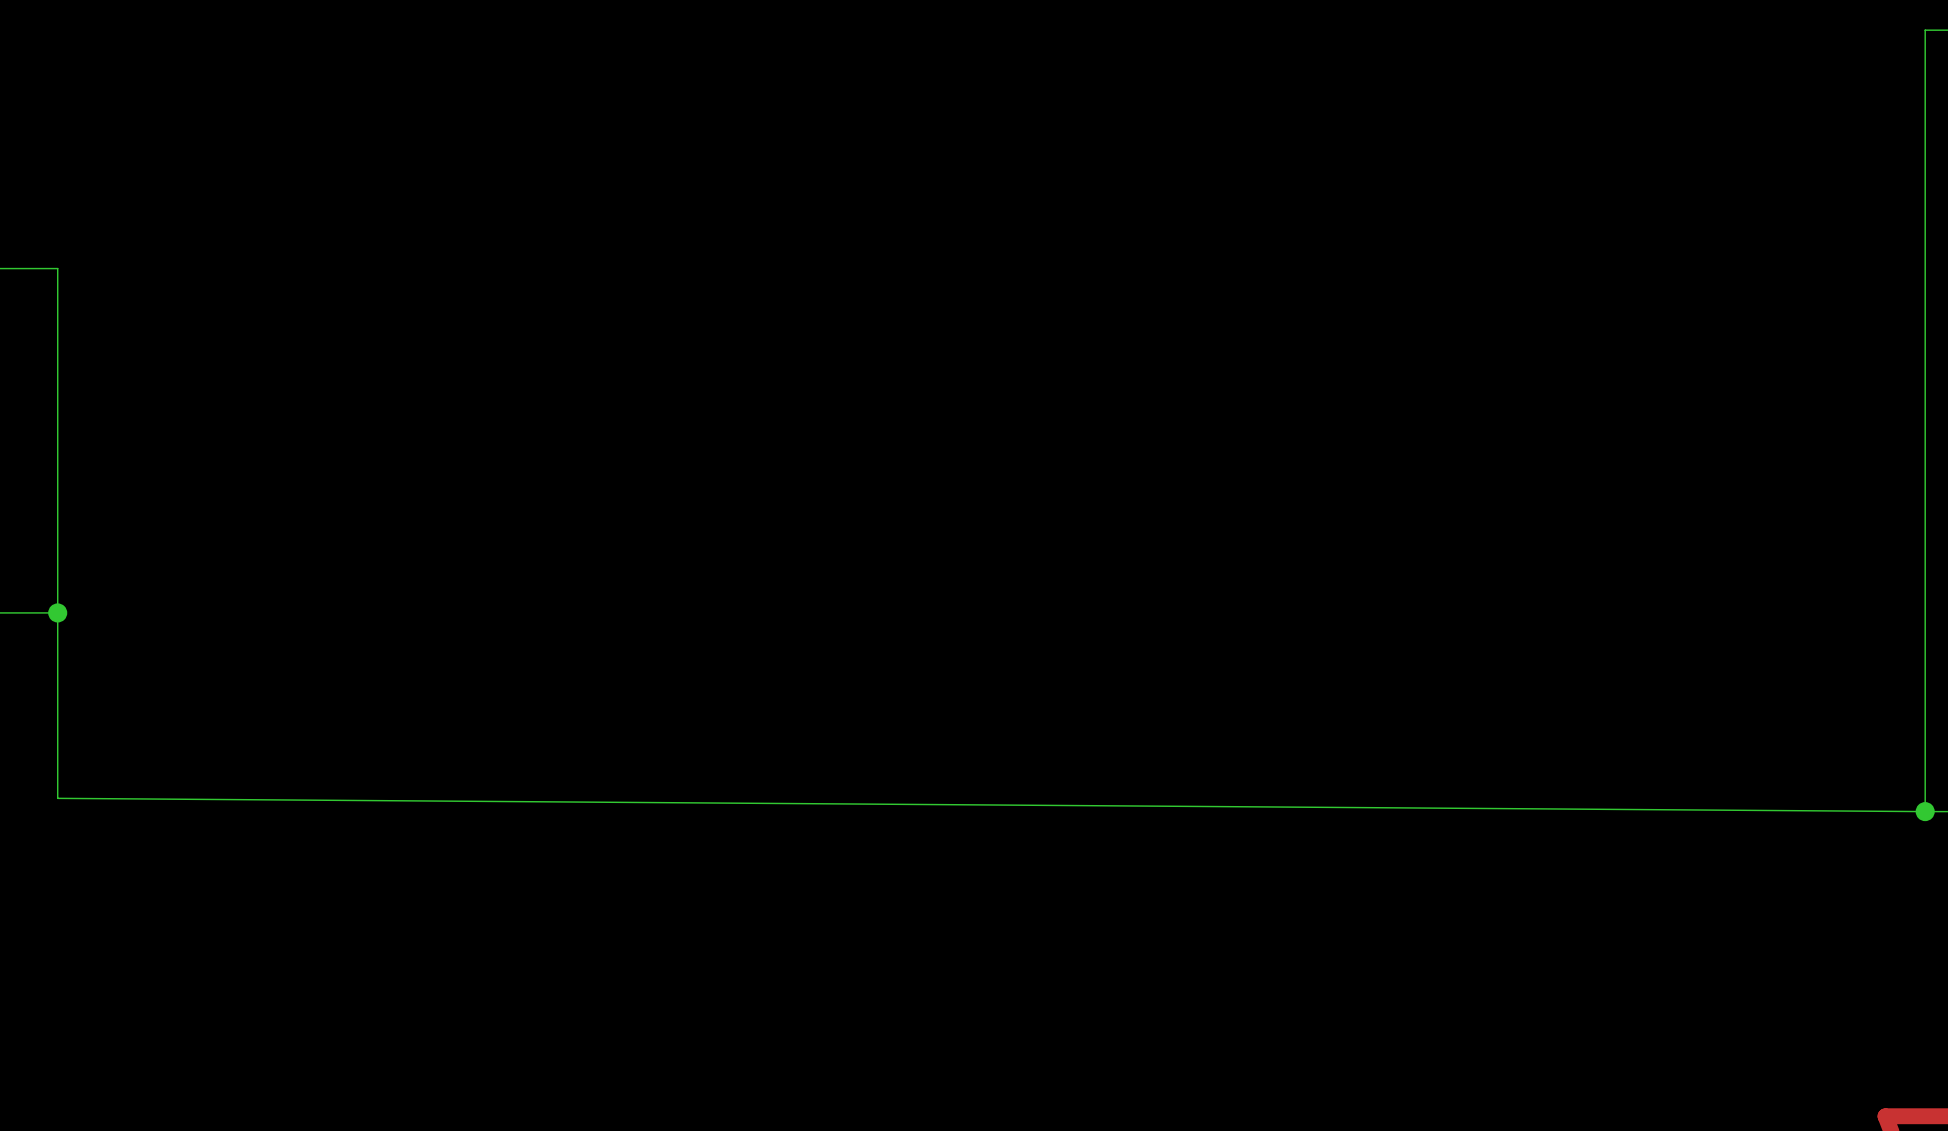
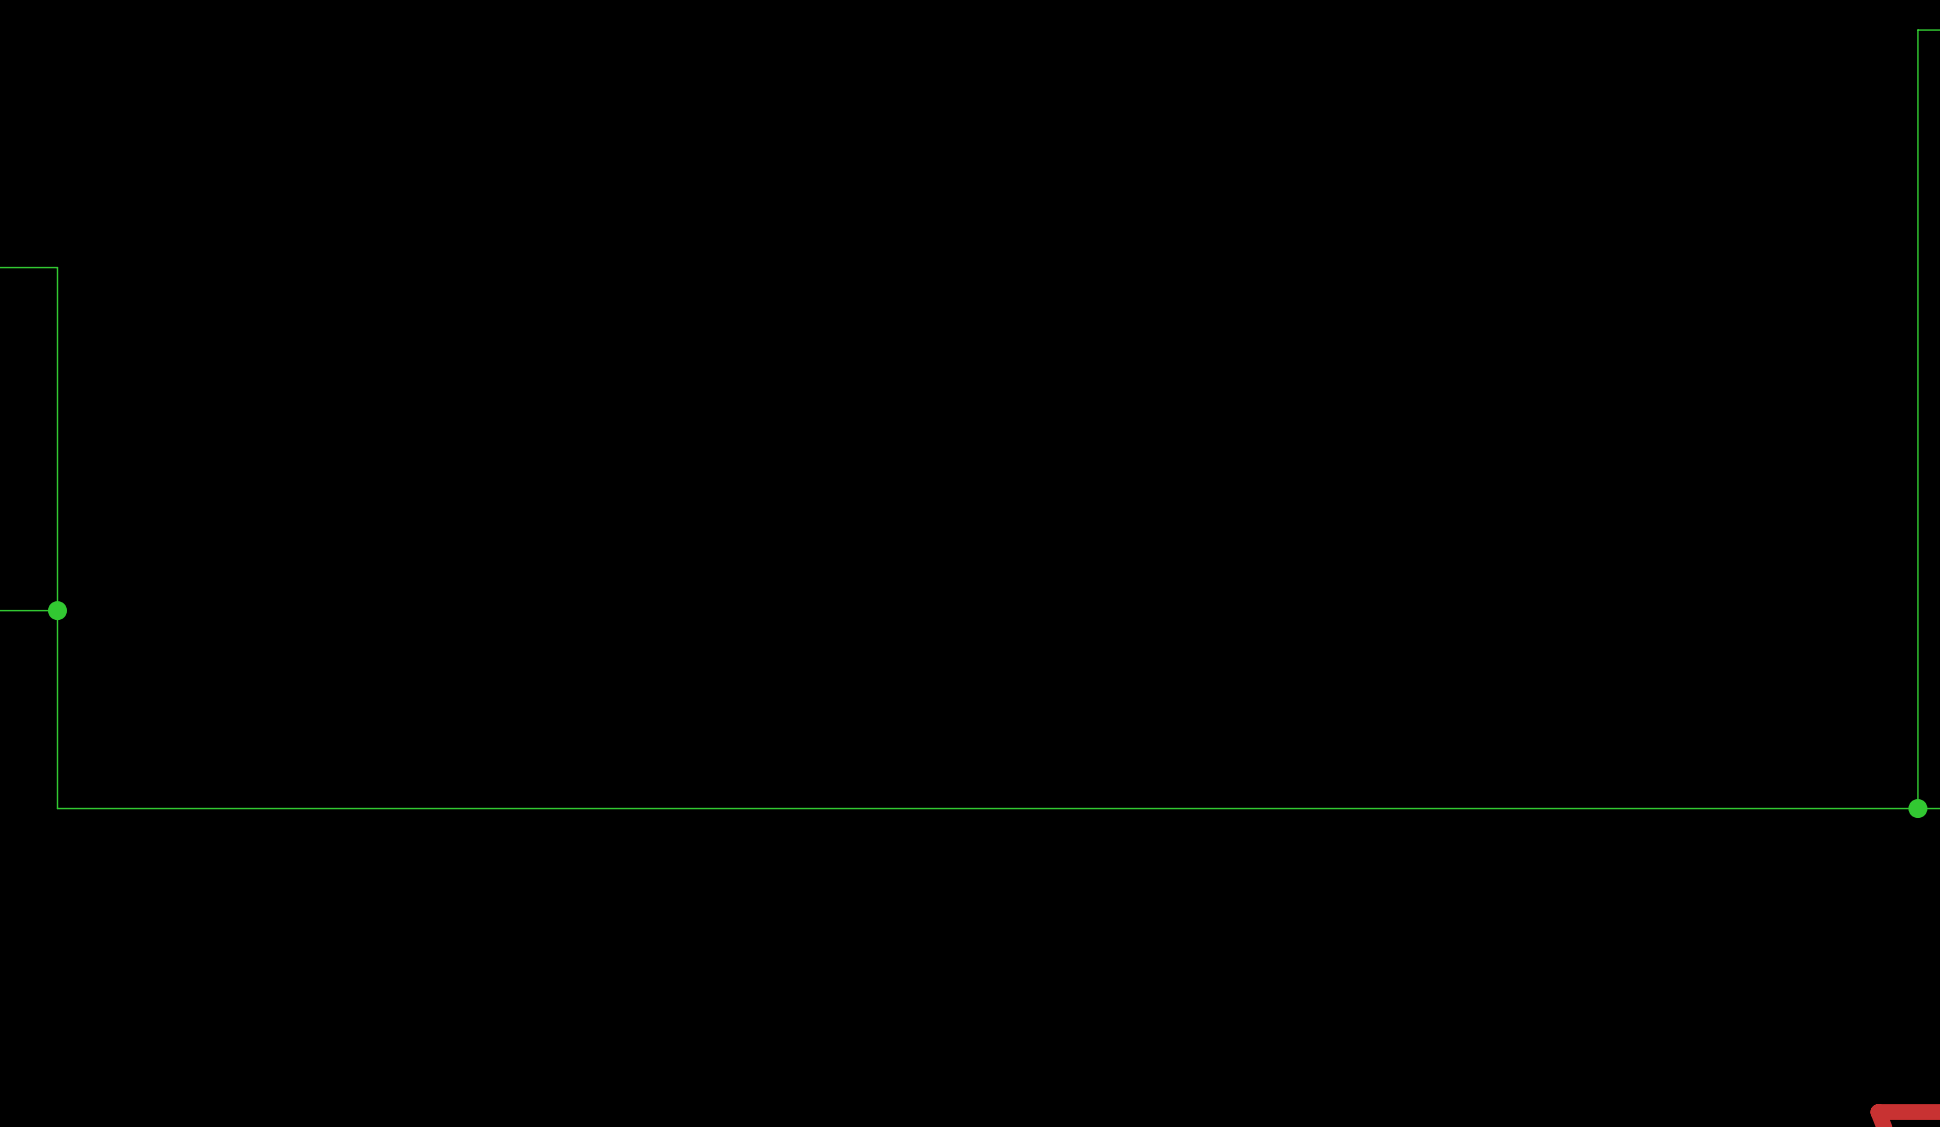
wire: (57, 798) (1925, 811) -> (57, 795) (57, 808) (1917, 808)

